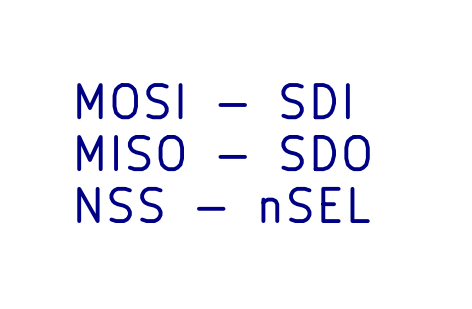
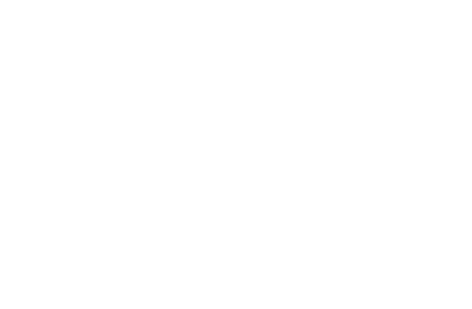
text: MOSI - SDI (213, 101) -> none
text: MISO - SDO (223, 153) -> none
text: NSS - nSEL (223, 204) -> none

